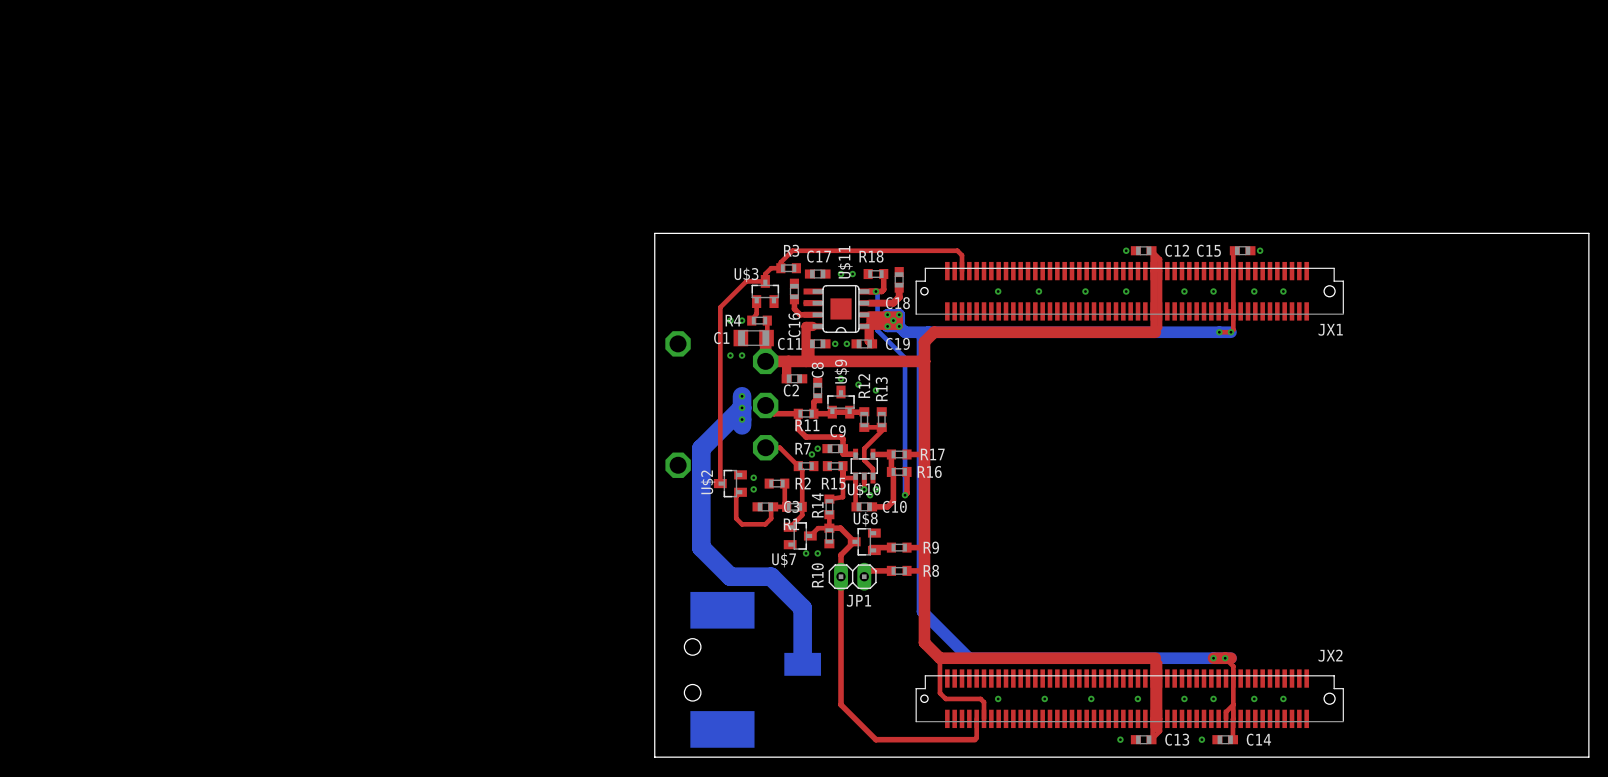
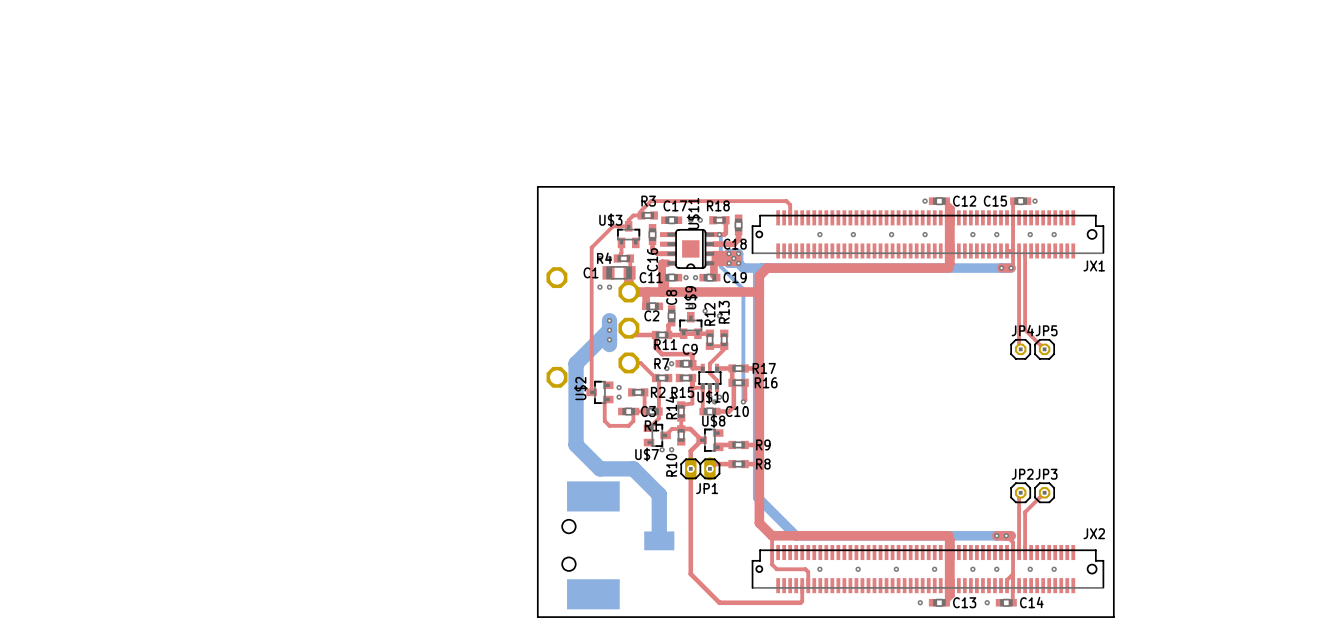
board edge: (1356, 233) (1588, 233) (1588, 757) (1356, 757) -> (1113, 186) (1113, 617)
top track: none -> (1019, 250) (1019, 347) (1020, 349)
top track: none -> (1025, 250) (1025, 329) (1044, 349)
top track width: thin (1219, 332) (1231, 332) -> thick (1001, 268) (1011, 268)
JP4: none -> (1020, 349)
JP5: none -> (1044, 349)
top track: none -> (1020, 492) (1019, 494) (1019, 552)
JP2: none -> (1020, 492)
top track: none -> (1044, 492) (1025, 512) (1025, 552)
JP3: none -> (1044, 492)

